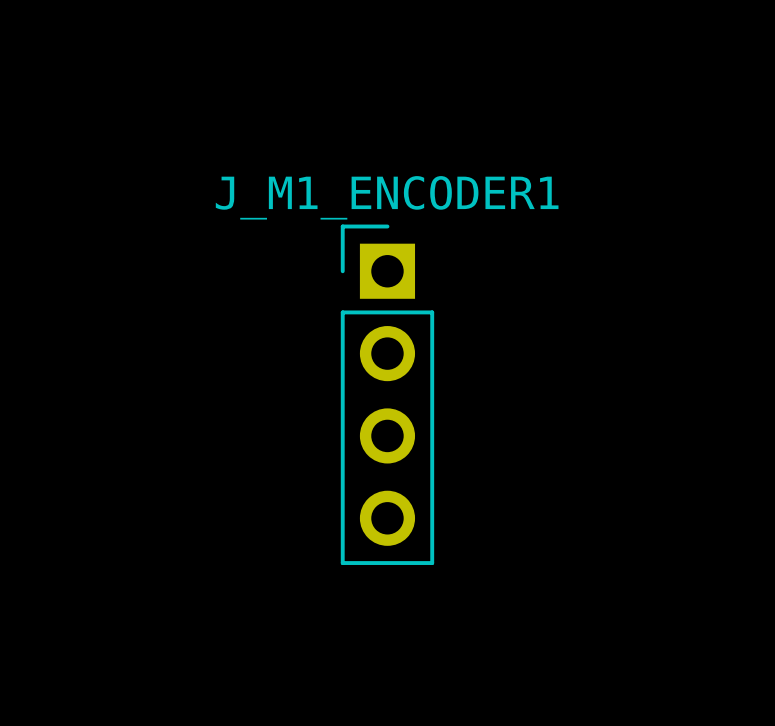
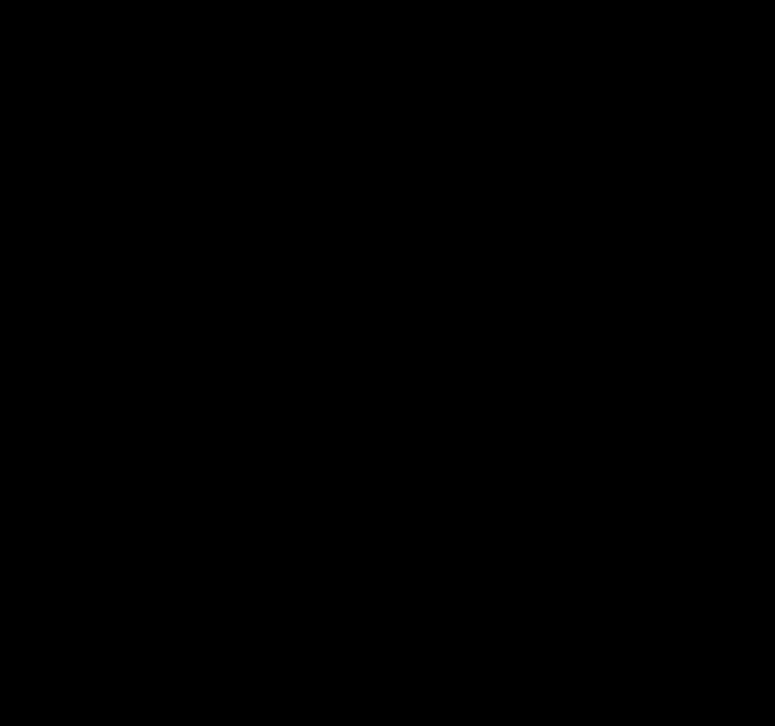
J_M1_ENCODER1: (387, 394) -> none

